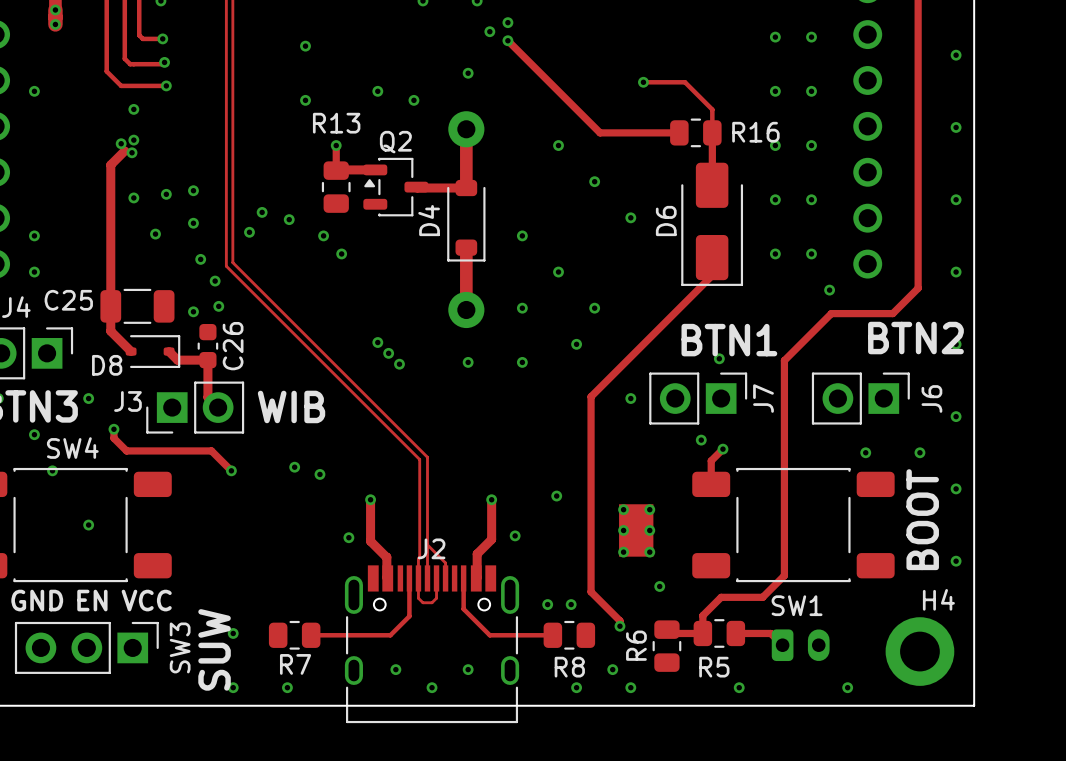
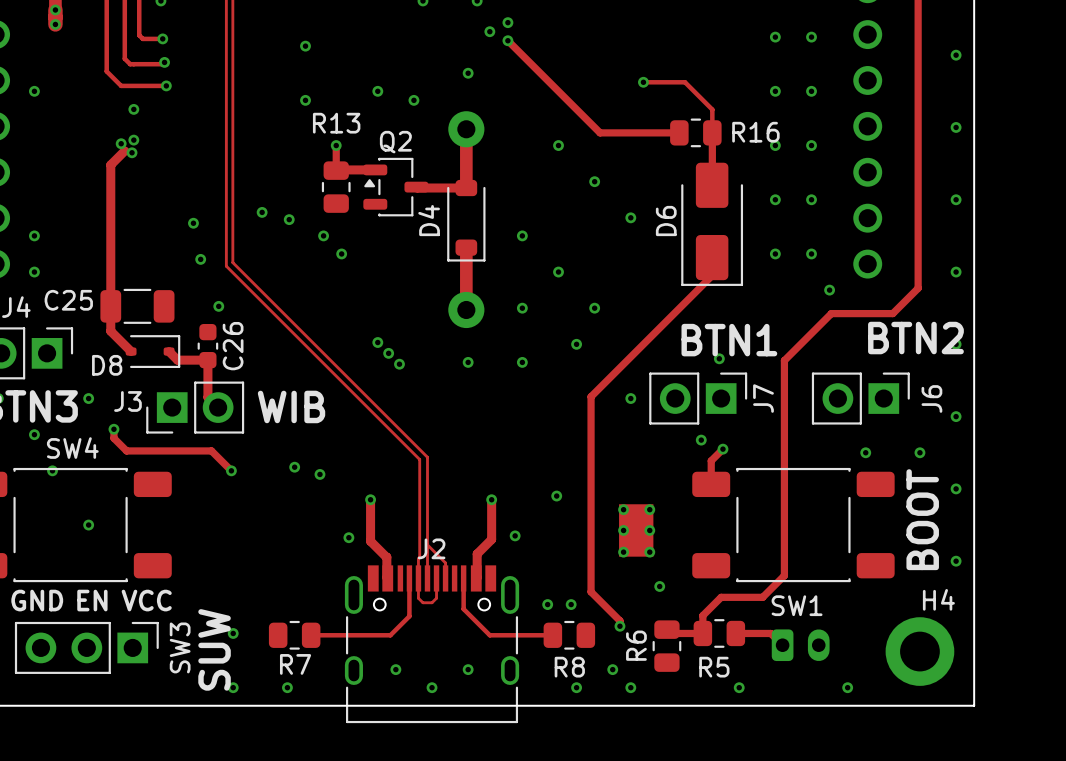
via: (193, 190) -> none
via: (166, 194) -> none
via: (133, 197) -> none
via: (249, 232) -> none
via: (155, 234) -> none
via: (215, 281) -> none
via: (193, 311) -> none

